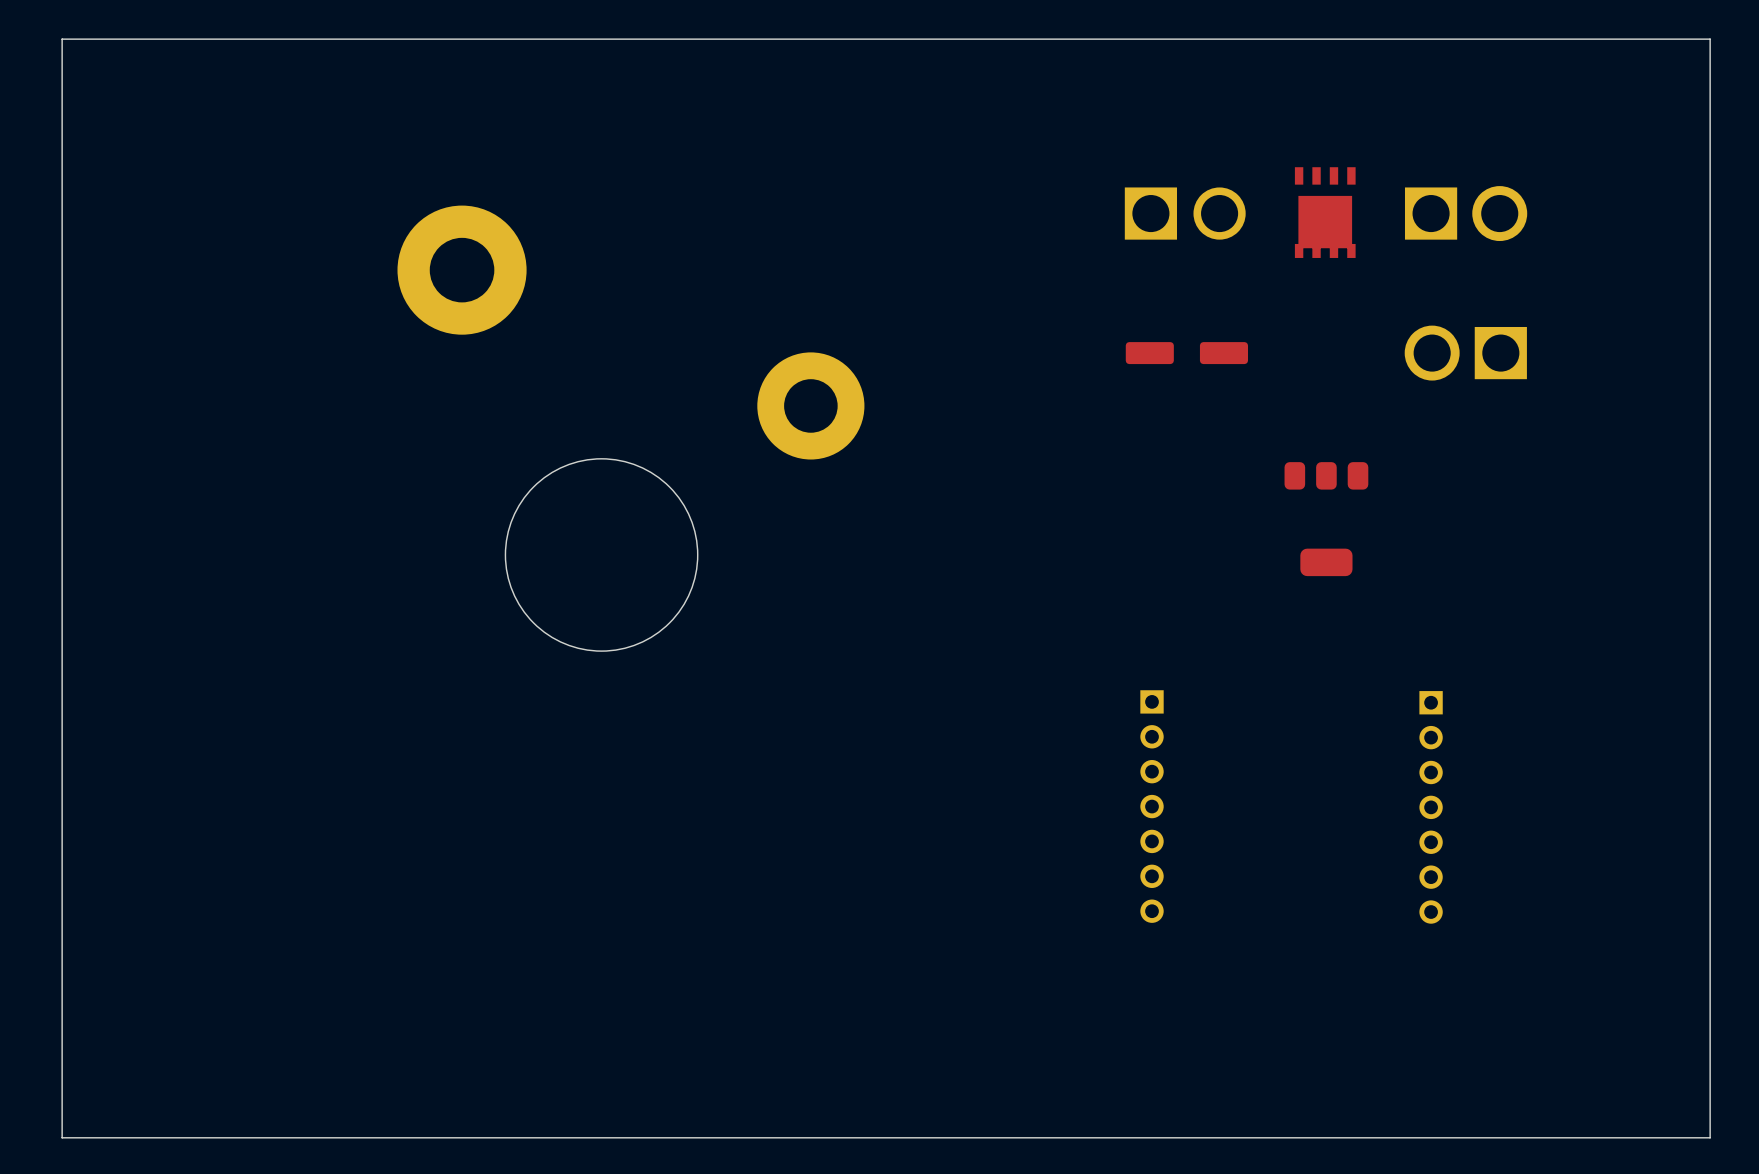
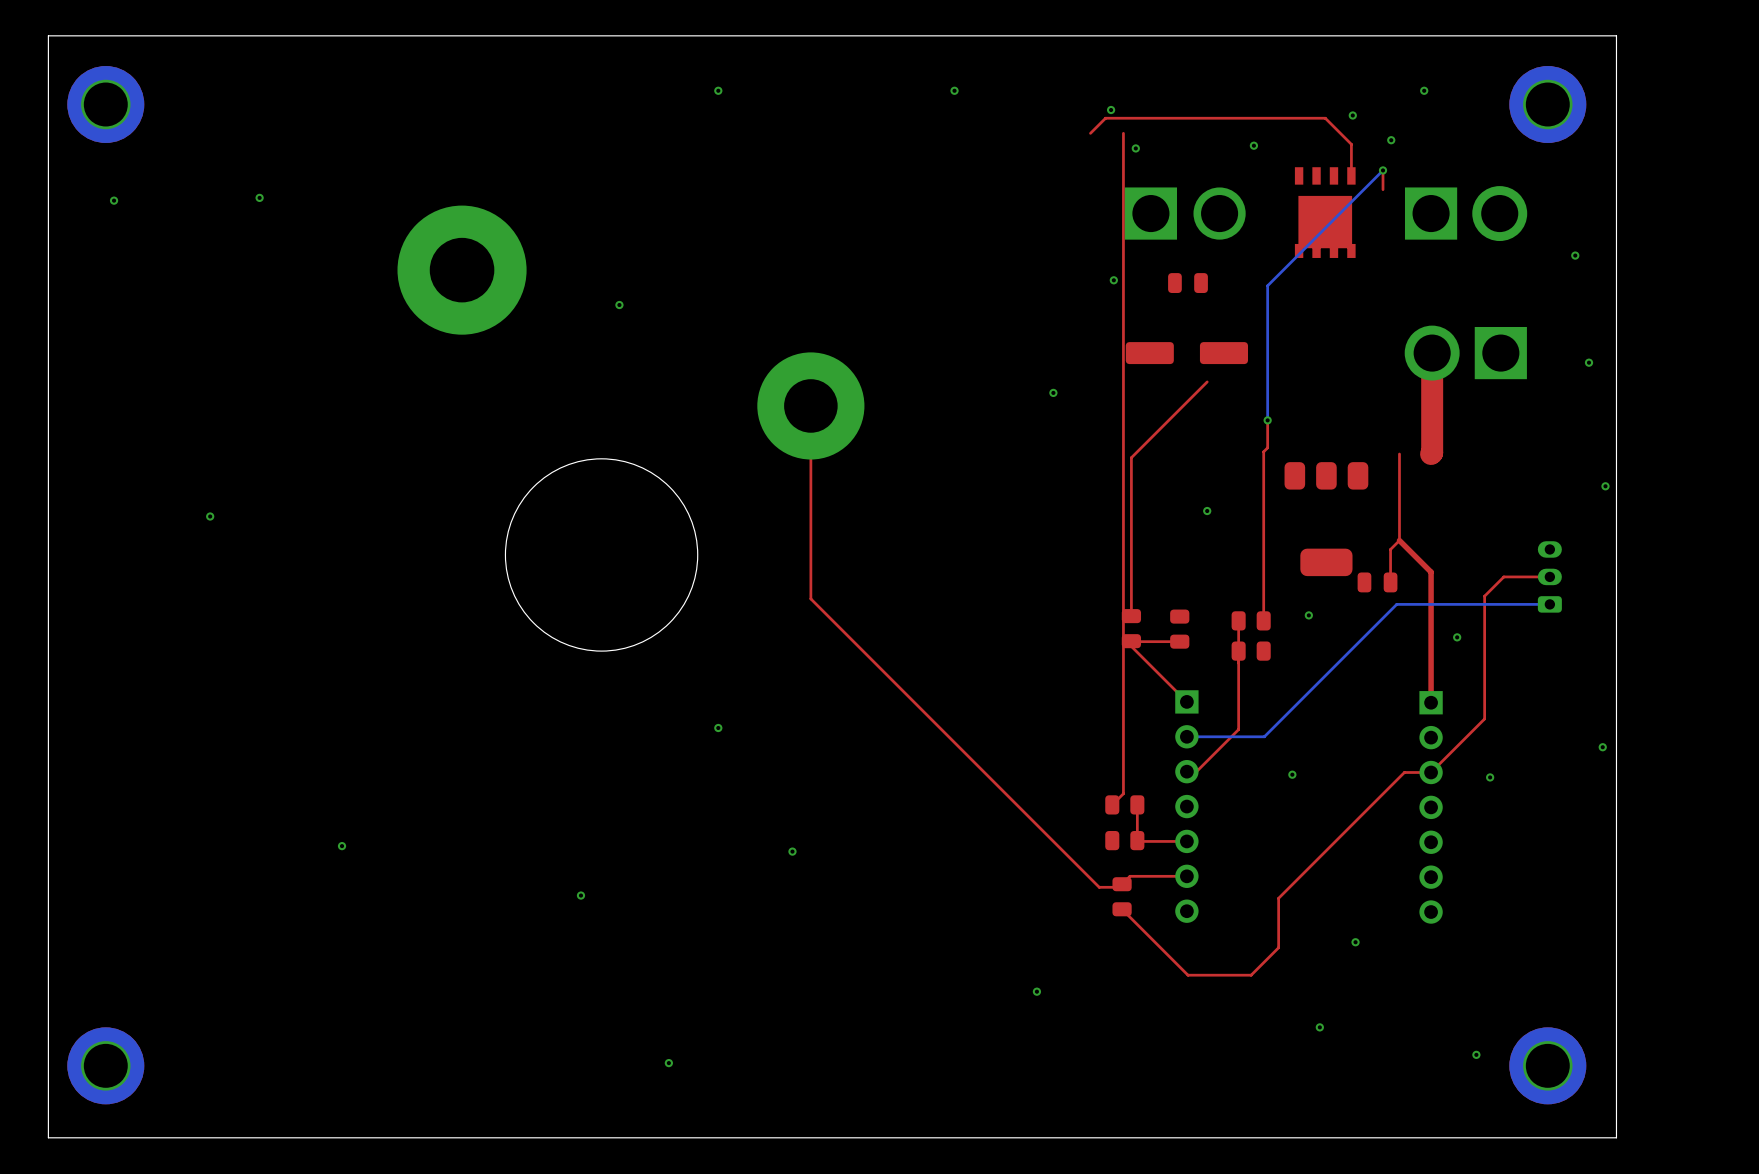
via: none -> (718, 90)
via: none -> (954, 90)
via: none -> (1424, 90)
part: none -> (105, 104)
part: none -> (1547, 104)
via: none -> (1111, 110)
via: none -> (1352, 115)
top track: none -> (1090, 133) (1105, 118) (1325, 118) (1351, 144) (1351, 175)
top track: none -> (1123, 133) (1123, 793) (1112, 804)
via: none -> (1391, 140)
via: none -> (1253, 145)
via: none -> (1135, 148)
top track: none -> (1383, 170) (1383, 189)
bottom track: none -> (1383, 170) (1267, 285) (1267, 420)
via: none -> (1383, 170)
via: none -> (259, 197)
via: none -> (114, 200)
via: none -> (1575, 255)
via: none -> (1113, 280)
part: none -> (1187, 283)
via: none -> (619, 305)
top track: none -> (1432, 353) (1431, 454)
via: none -> (1589, 362)
top track: none -> (1207, 381) (1131, 457) (1131, 616)
via: none -> (1053, 392)
top track: none -> (810, 405) (810, 598) (1099, 887) (1118, 887) (1129, 876) (1186, 876)
top track: none -> (1267, 420) (1267, 447) (1263, 451) (1263, 620)
via: none -> (1267, 420)
top track: none -> (1399, 454) (1399, 540)
via: none -> (1605, 486)
via: none -> (1207, 511)
via: none -> (210, 516)
top track: none -> (1399, 540) (1390, 549) (1390, 582)
top track: none -> (1399, 540) (1431, 572) (1431, 702)
top track: none -> (1549, 576) (1503, 576) (1484, 596) (1484, 718) (1431, 772) (1404, 772) (1278, 898) (1278, 947) (1251, 975) (1187, 975) (1122, 909)
part: none -> (1549, 576)
part: none -> (1377, 582)
bottom track: none -> (1549, 604) (1396, 604) (1264, 736) (1186, 736)
via: none -> (1308, 615)
top track: none -> (1238, 620) (1238, 729) (1196, 771)
part: none -> (1251, 620)
part: none -> (1131, 628)
part: none -> (1179, 629)
via: none -> (1457, 637)
top track: none -> (1179, 641) (1131, 641) (1131, 646) (1186, 701)
part: none -> (1251, 651)
via: none -> (718, 728)
via: none -> (1602, 747)
via: none -> (1292, 774)
via: none -> (1490, 777)
part: none -> (1124, 804)
top track: none -> (1137, 804) (1138, 841) (1186, 841)
part position: (1152, 806) -> (1186, 806)
part: none -> (1124, 840)
via: none -> (342, 846)
via: none -> (792, 851)
via: none -> (580, 895)
part: none -> (1122, 896)
via: none -> (1355, 942)
via: none -> (1036, 991)
via: none -> (1319, 1027)
via: none -> (1476, 1054)
via: none -> (668, 1063)
part: none -> (105, 1065)
part: none -> (1547, 1065)
board edge: (1616, 1137) (1710, 1137) (1710, 39) (62, 39) (62, 1137) -> (1616, 1137) (1616, 35) (48, 35) (48, 1137) (62, 1137)

